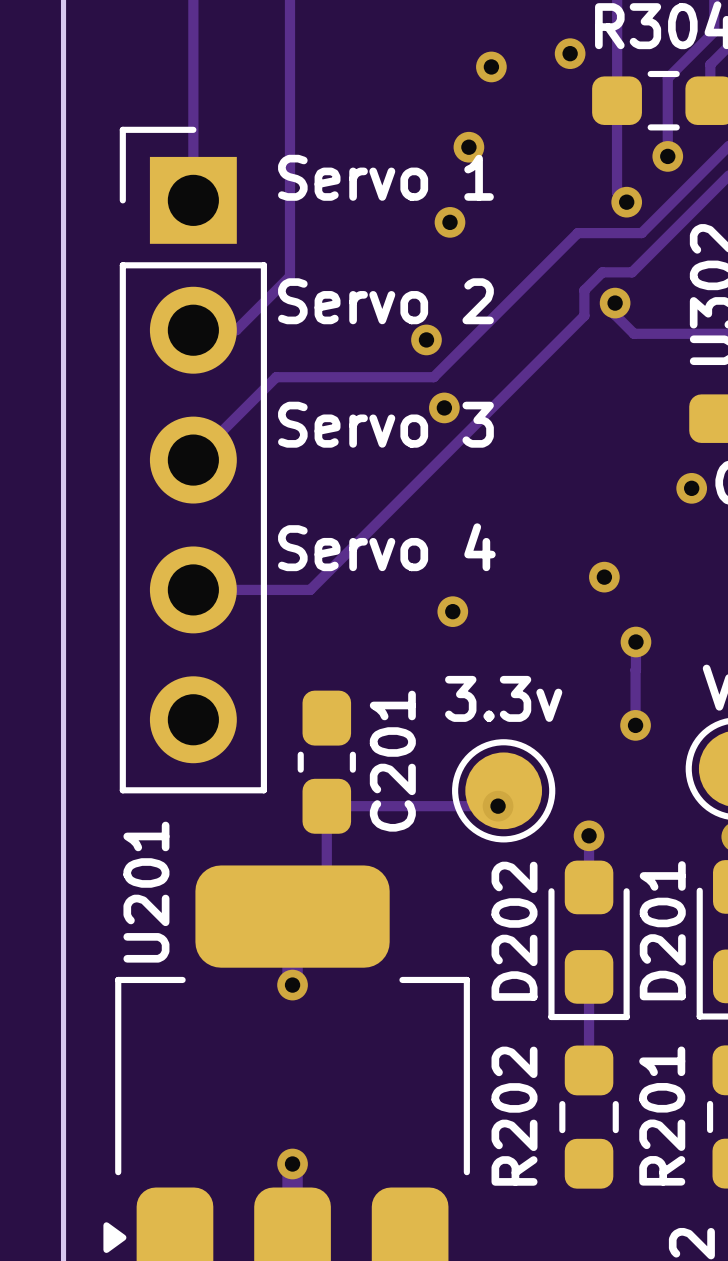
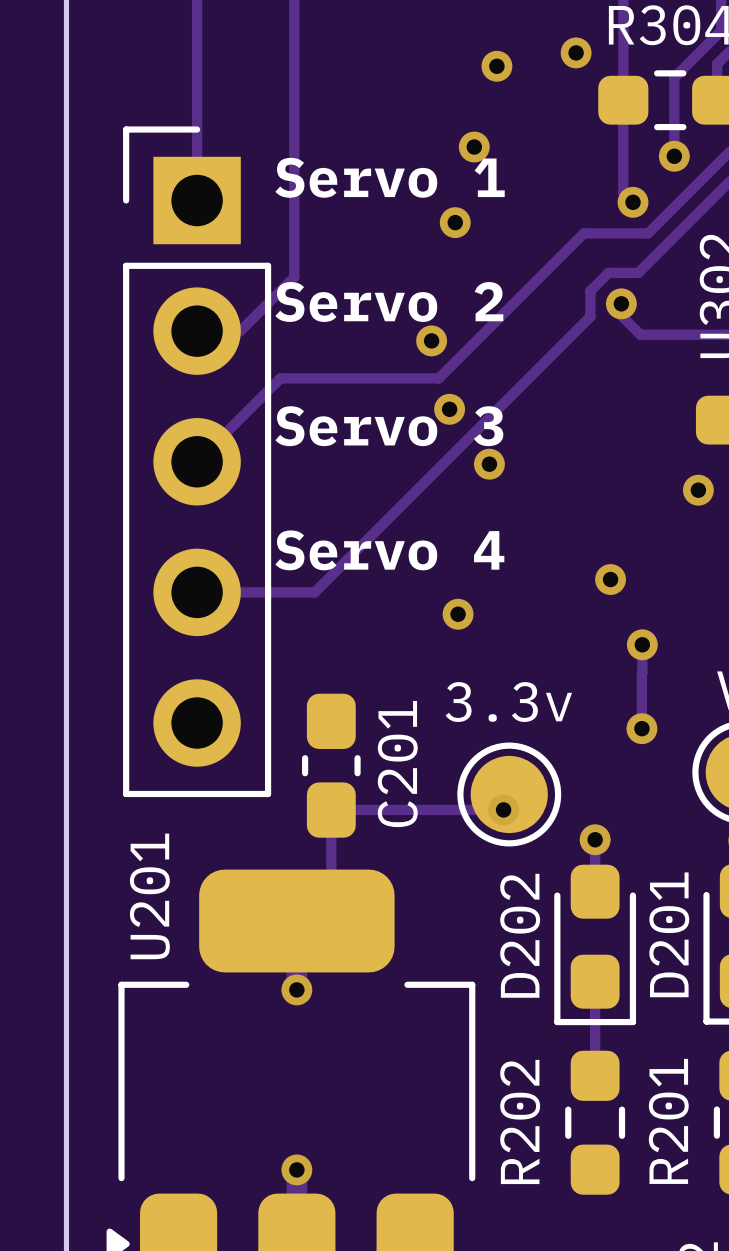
via: none -> (489, 464)

